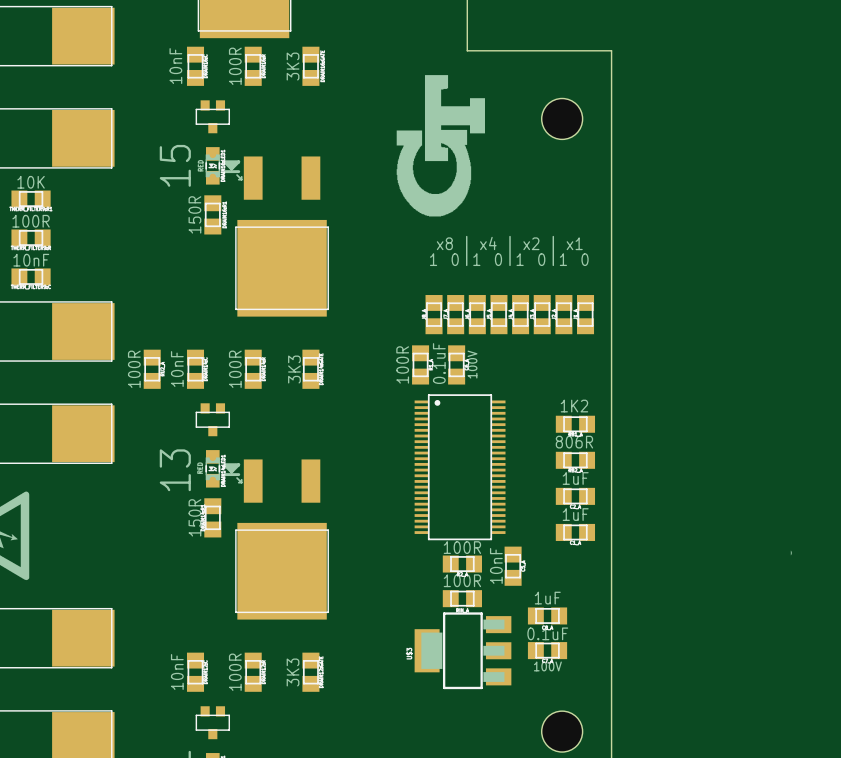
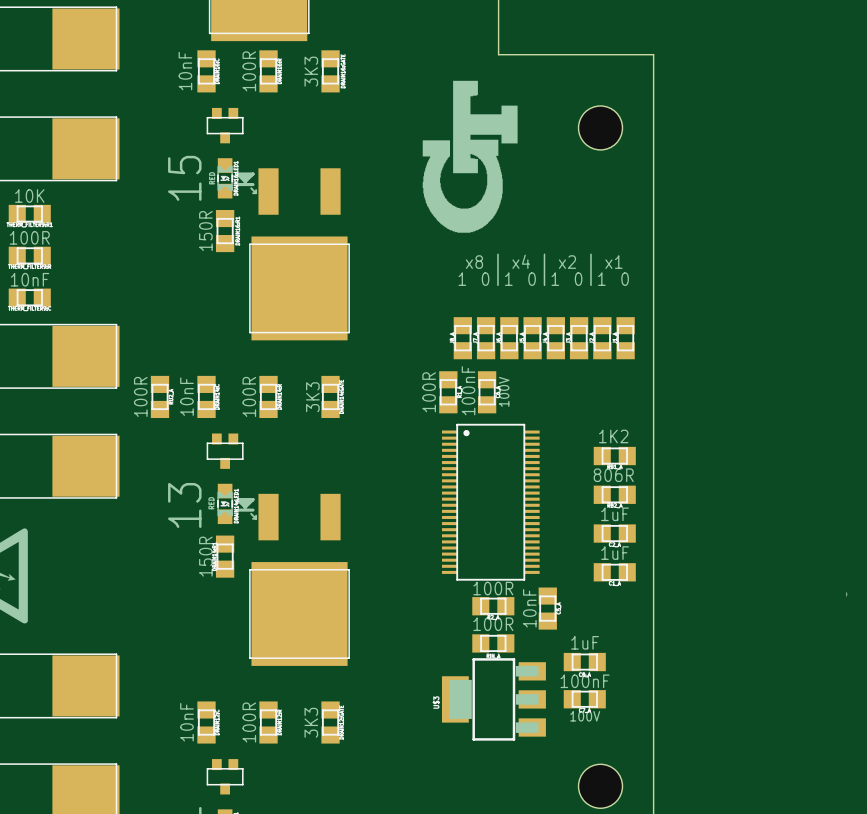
part value: 0.1uF (439, 363) -> 100nF (468, 390)
part value: 0.1uF (547, 633) -> 100nF (585, 681)

